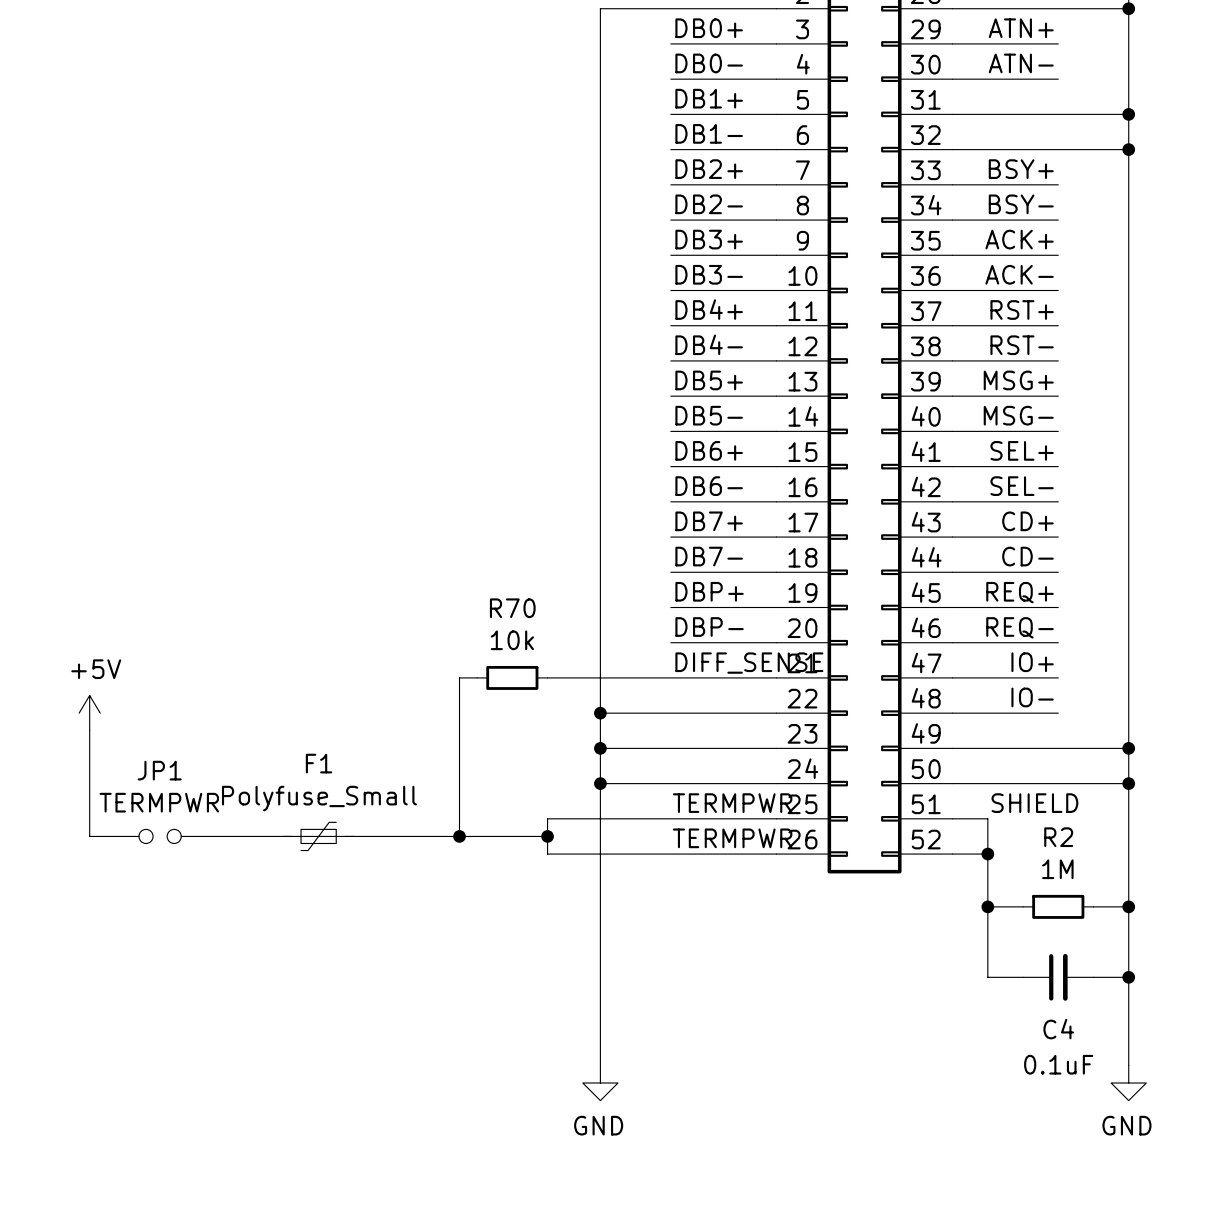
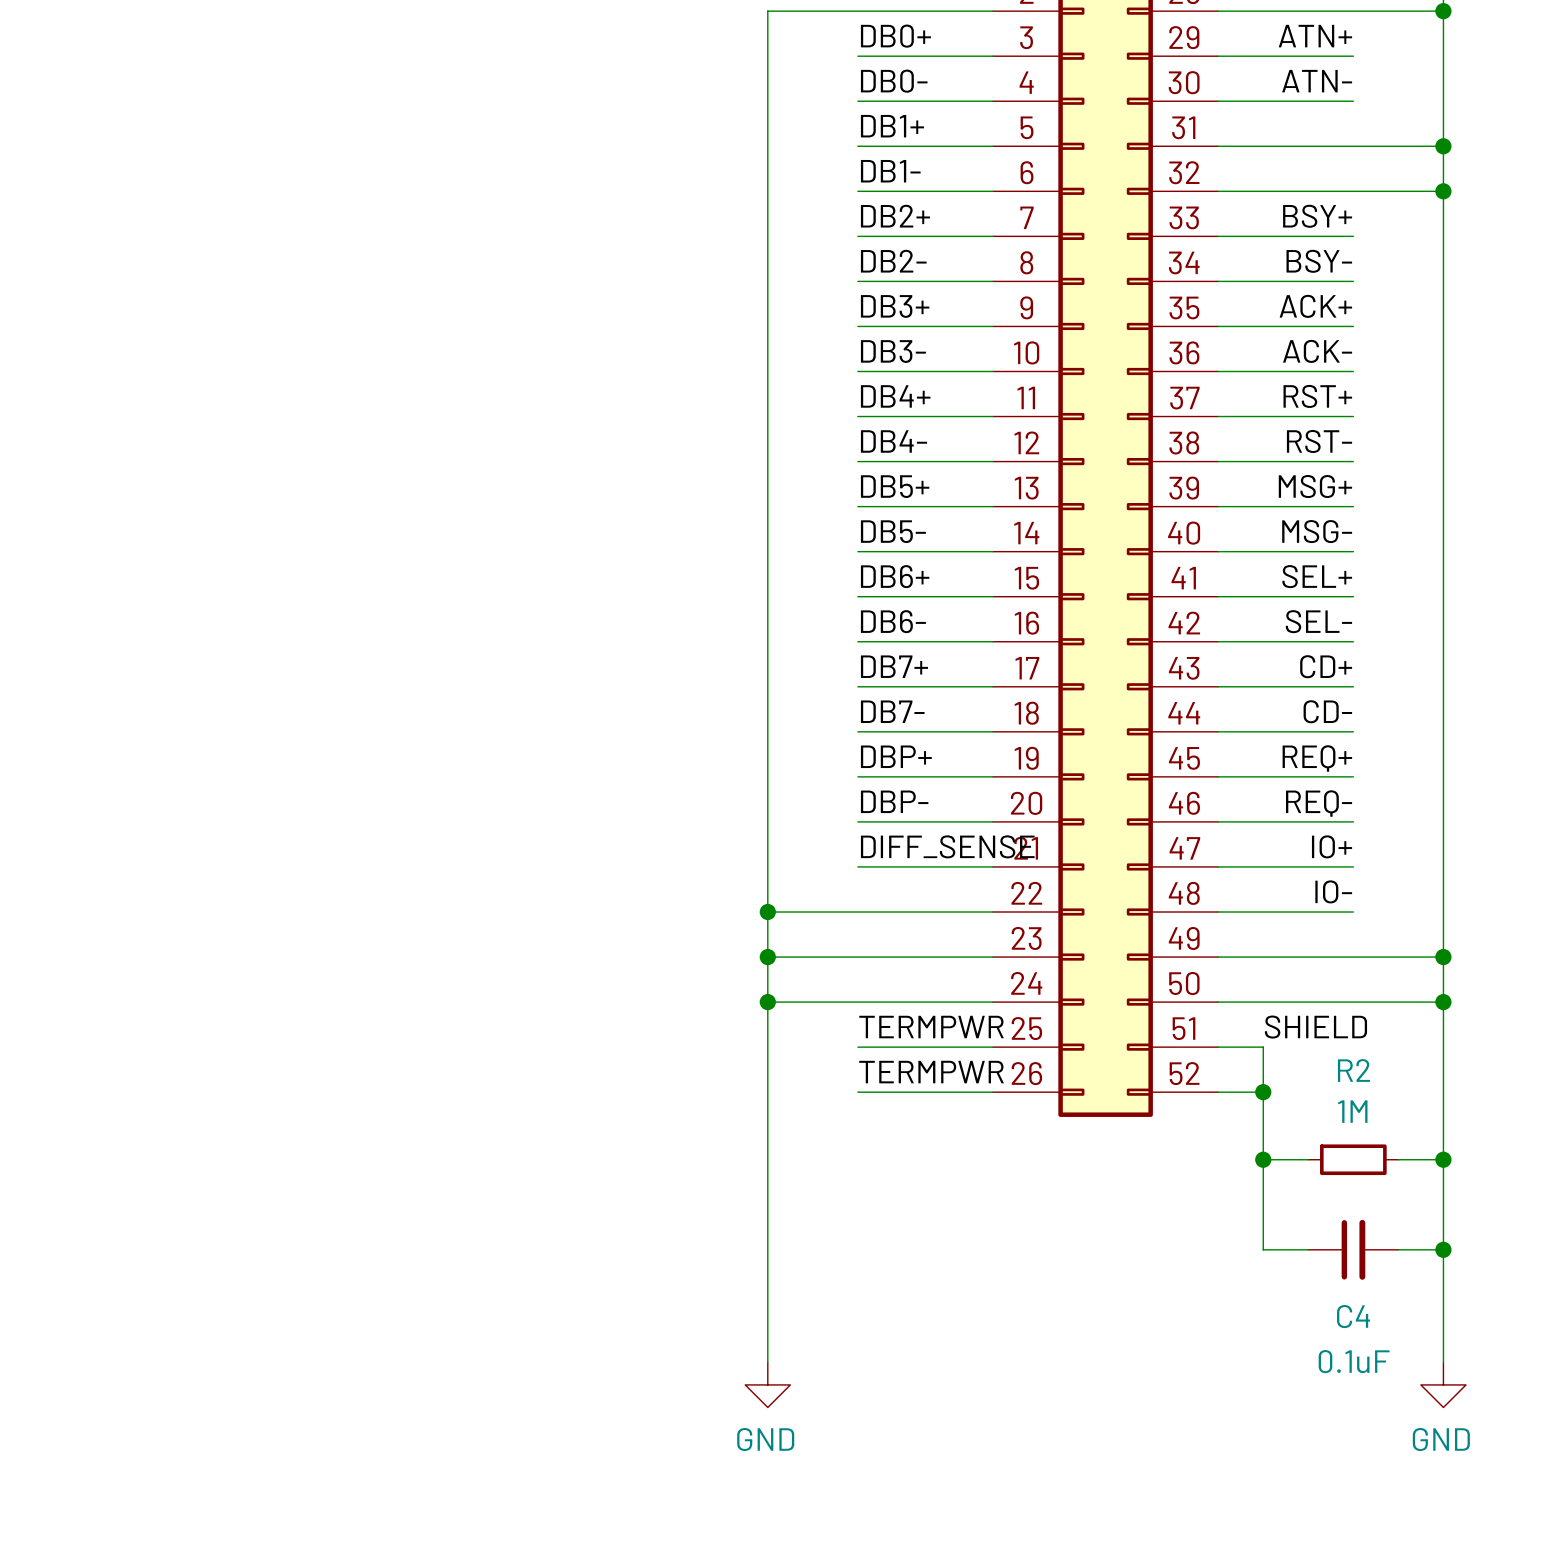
wire: (477, 677) (459, 677) (459, 836) -> none
R70: 10k (512, 677) -> none
wire: (547, 677) (670, 677) -> none
power symbol: +5V (89, 713) -> none
wire: (89, 730) (89, 836) (124, 836) -> none
wire: (670, 818) (547, 818) (547, 854) (670, 854) -> none
JP1: TERMPWR (160, 836) -> none
wire: (195, 836) (283, 836) -> none
F1: Polyfuse_Small (318, 836) -> none
wire: (353, 836) (547, 836) -> none
junction: (459, 836) -> none
junction: (547, 836) -> none

